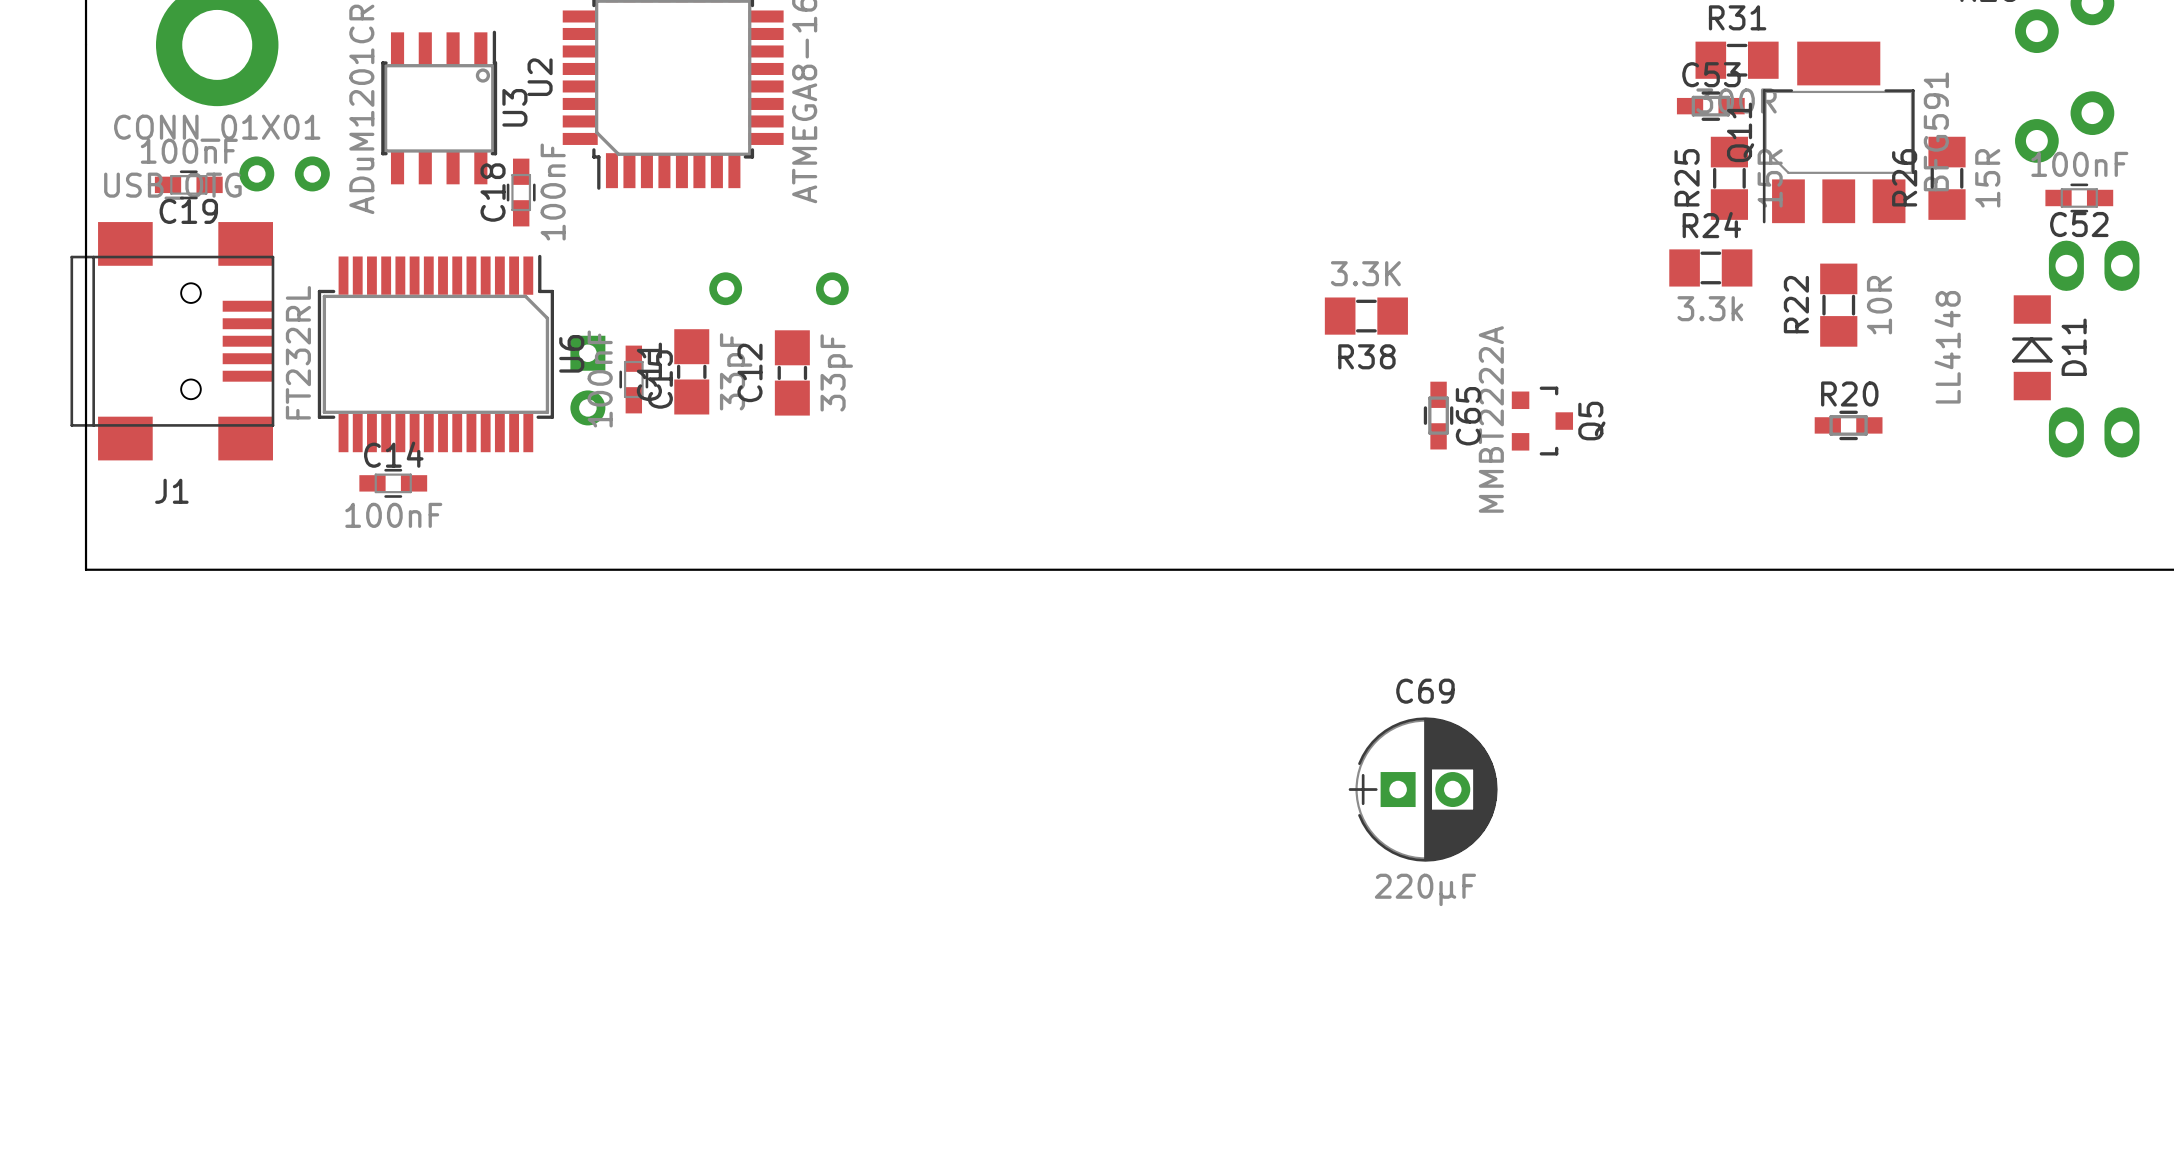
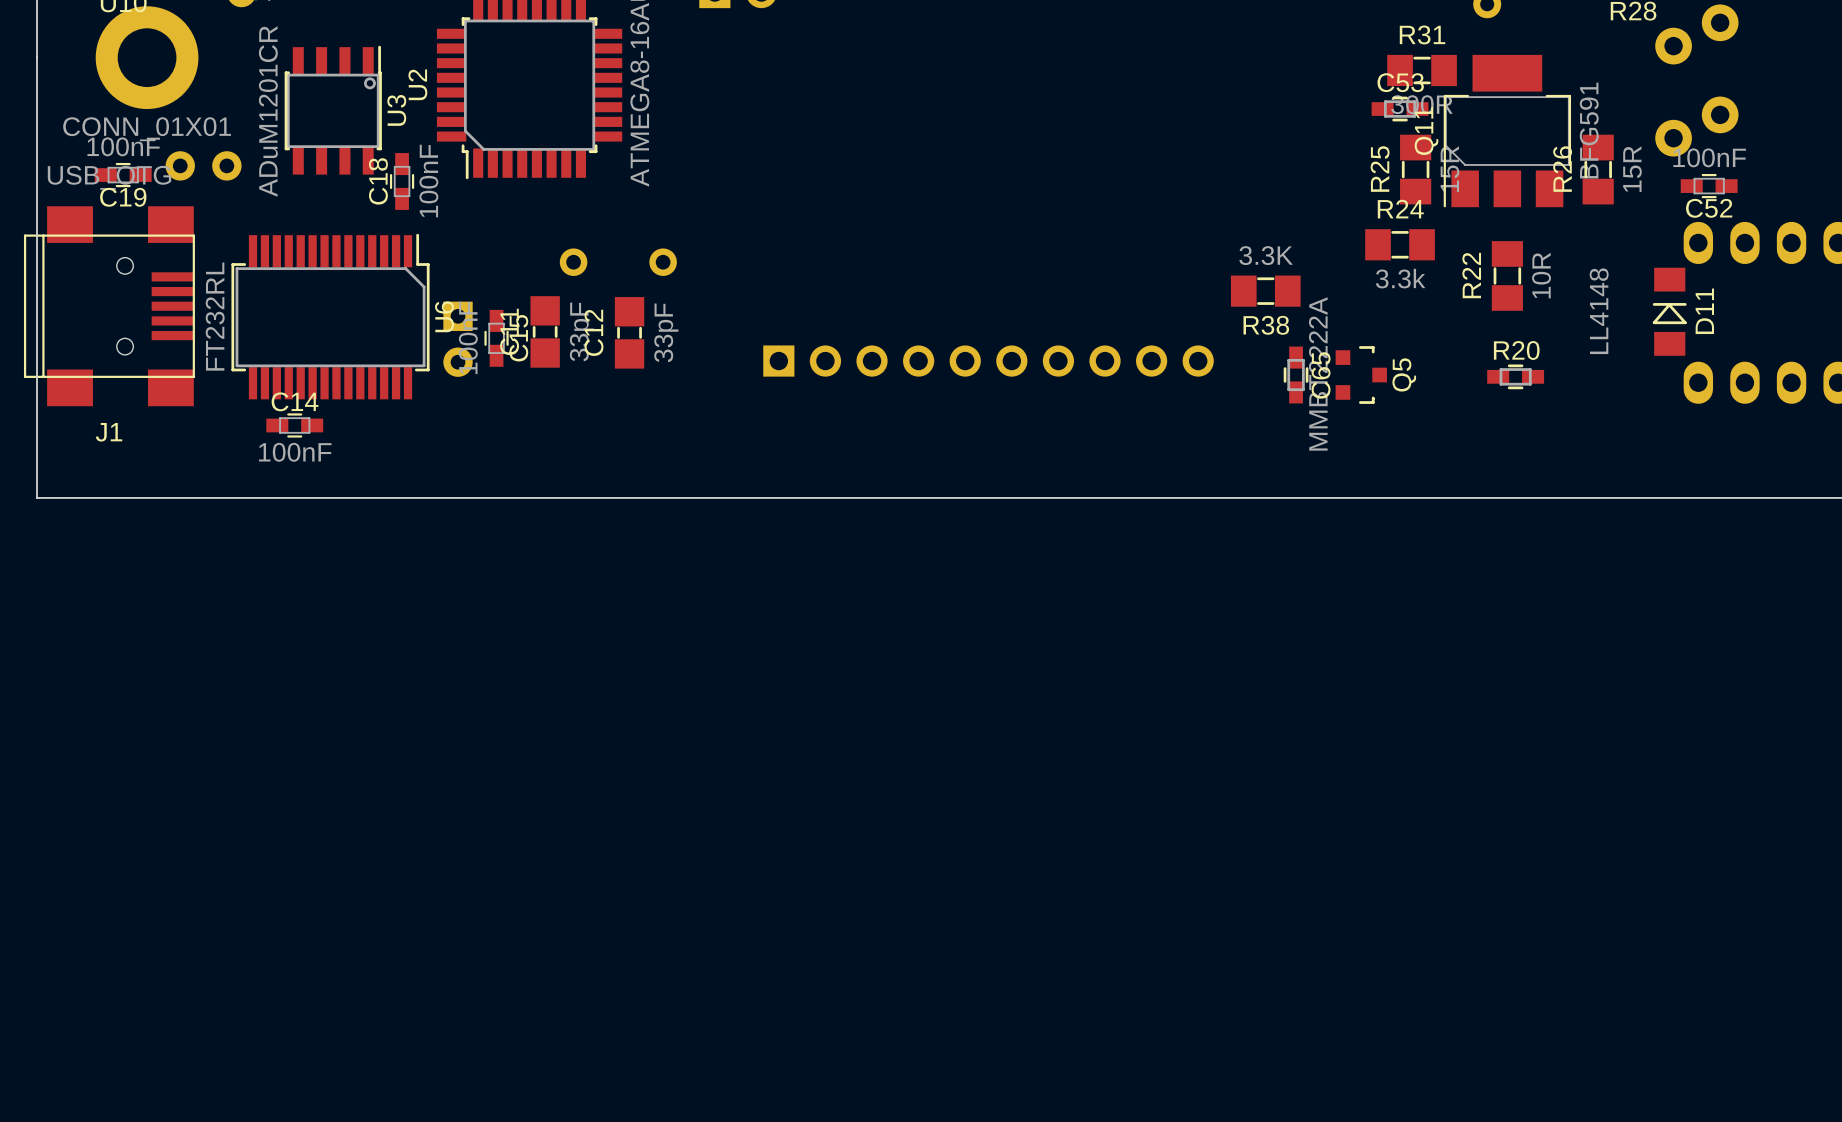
R38 position: (1366, 316) -> (1265, 291)
part: none -> (988, 361)
C65 position: (1438, 415) -> (1296, 375)
Q5 position: (1542, 421) -> (1361, 375)
C69: 220µF (1423, 789) -> none

